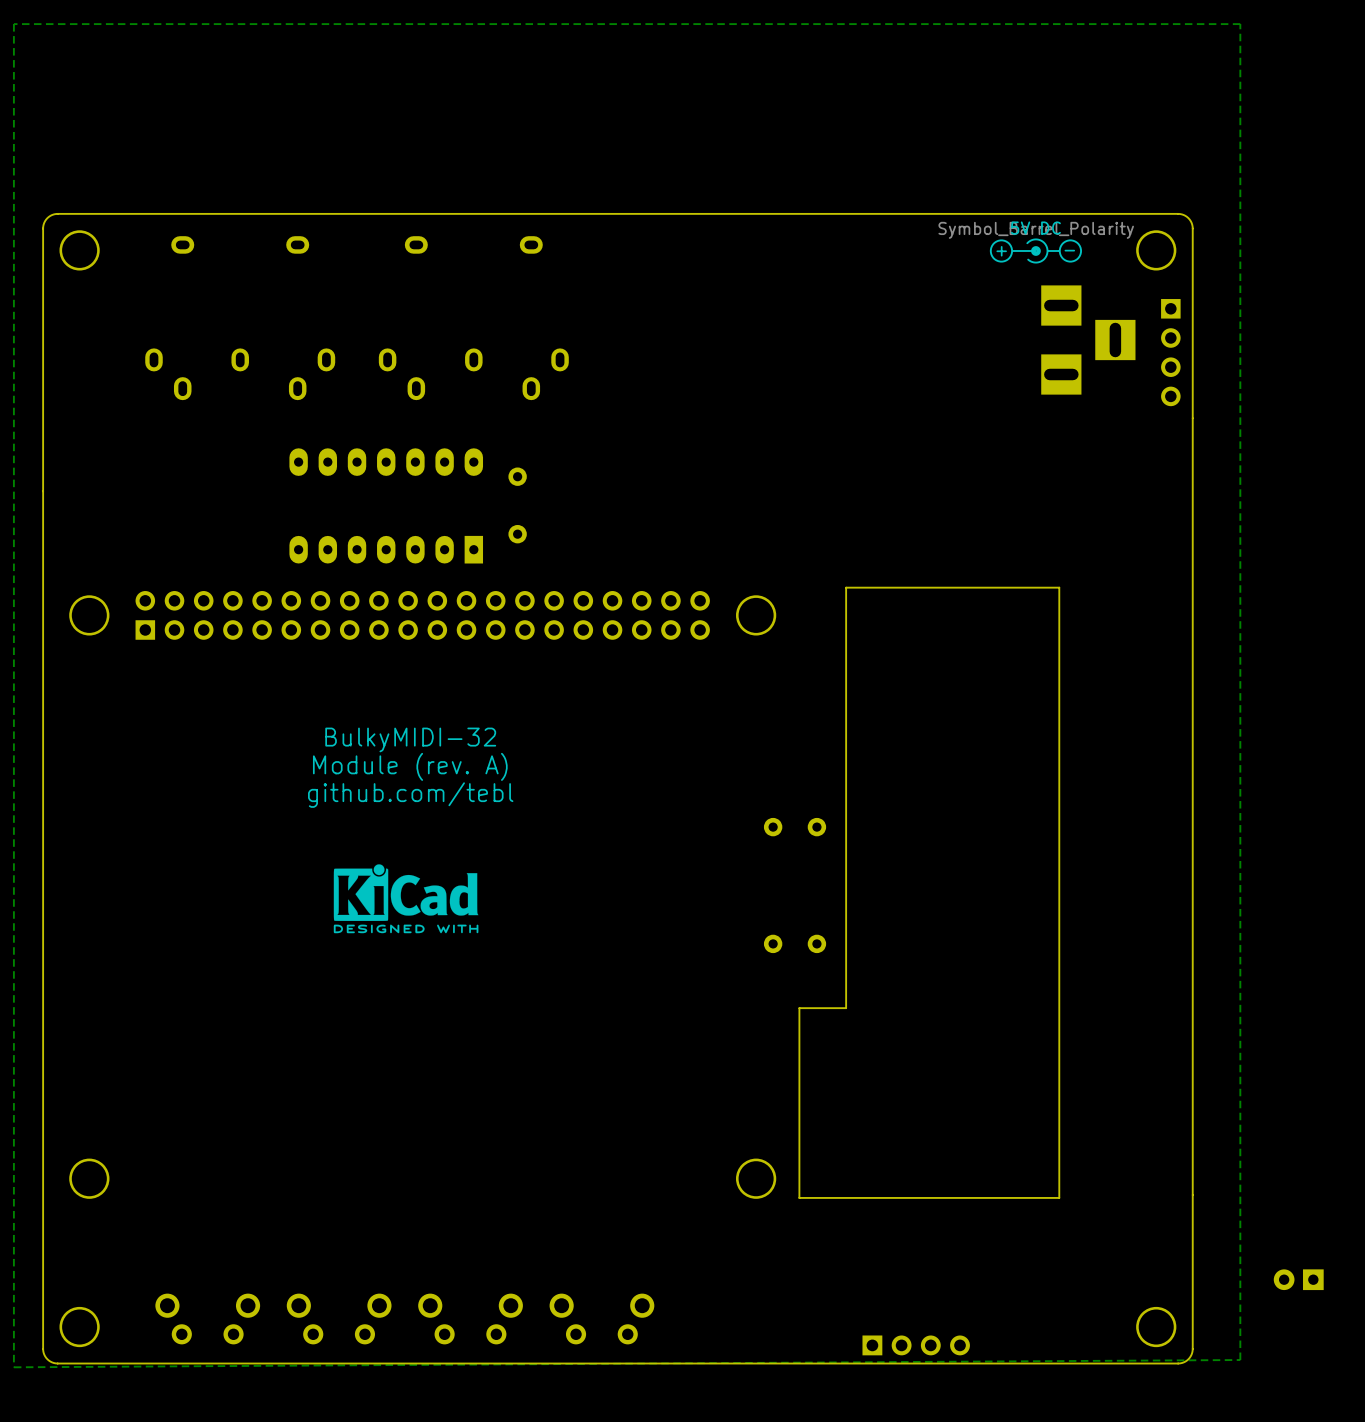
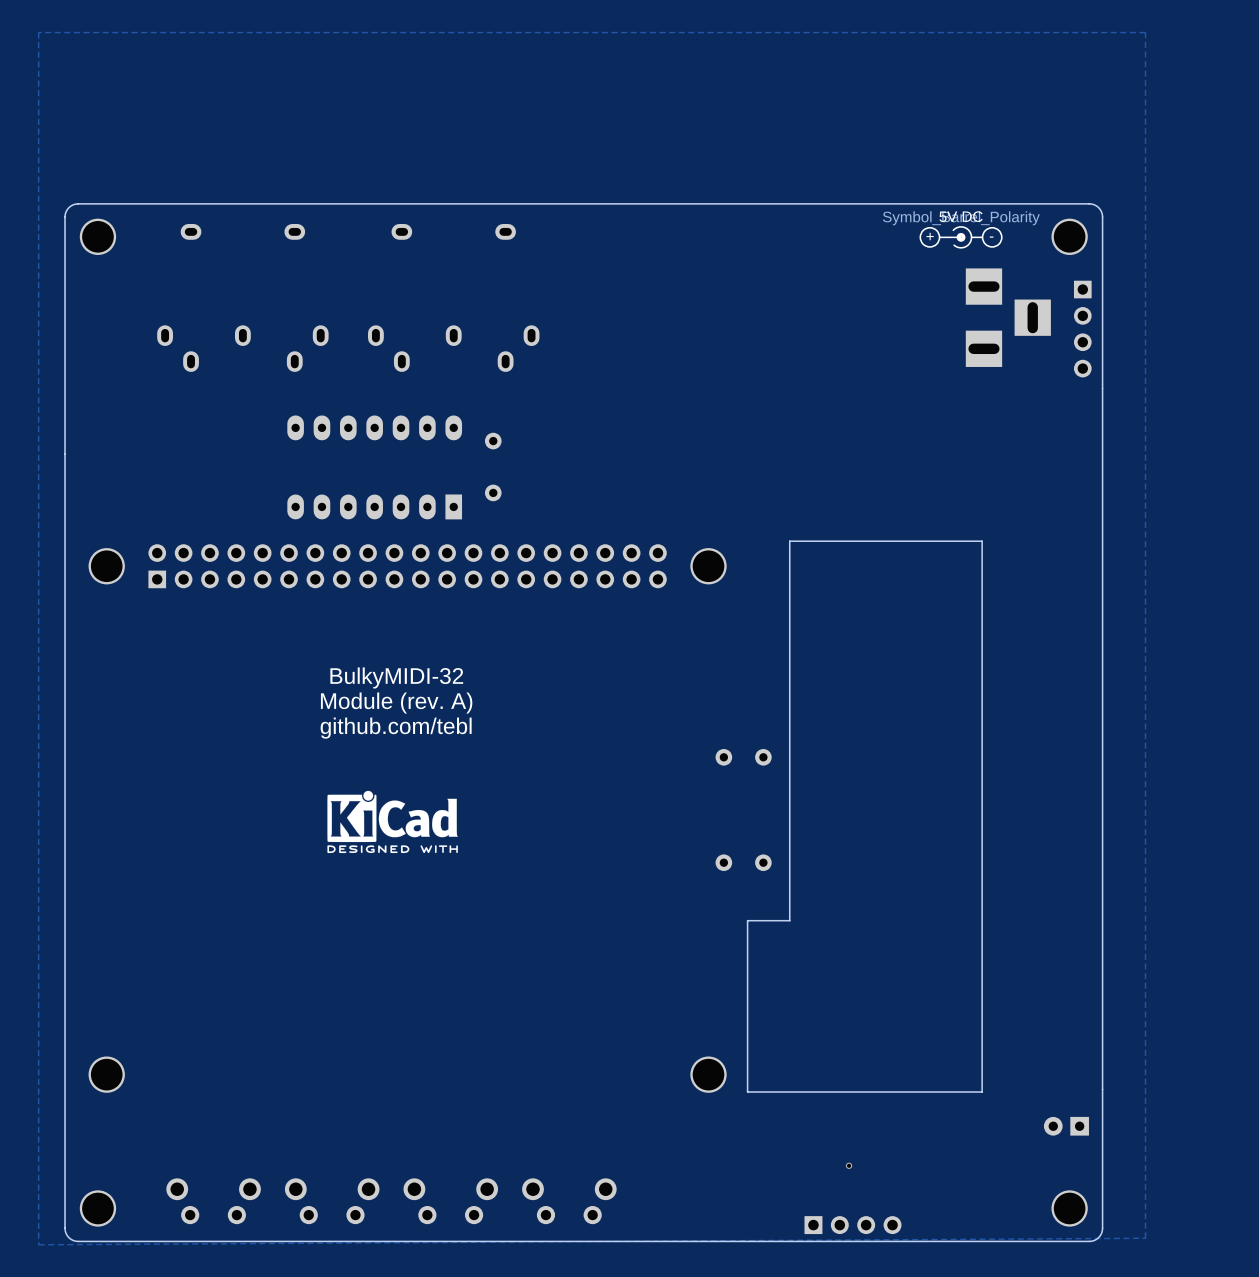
via: none -> (849, 1165)
part position: (1298, 1279) -> (1066, 1126)

